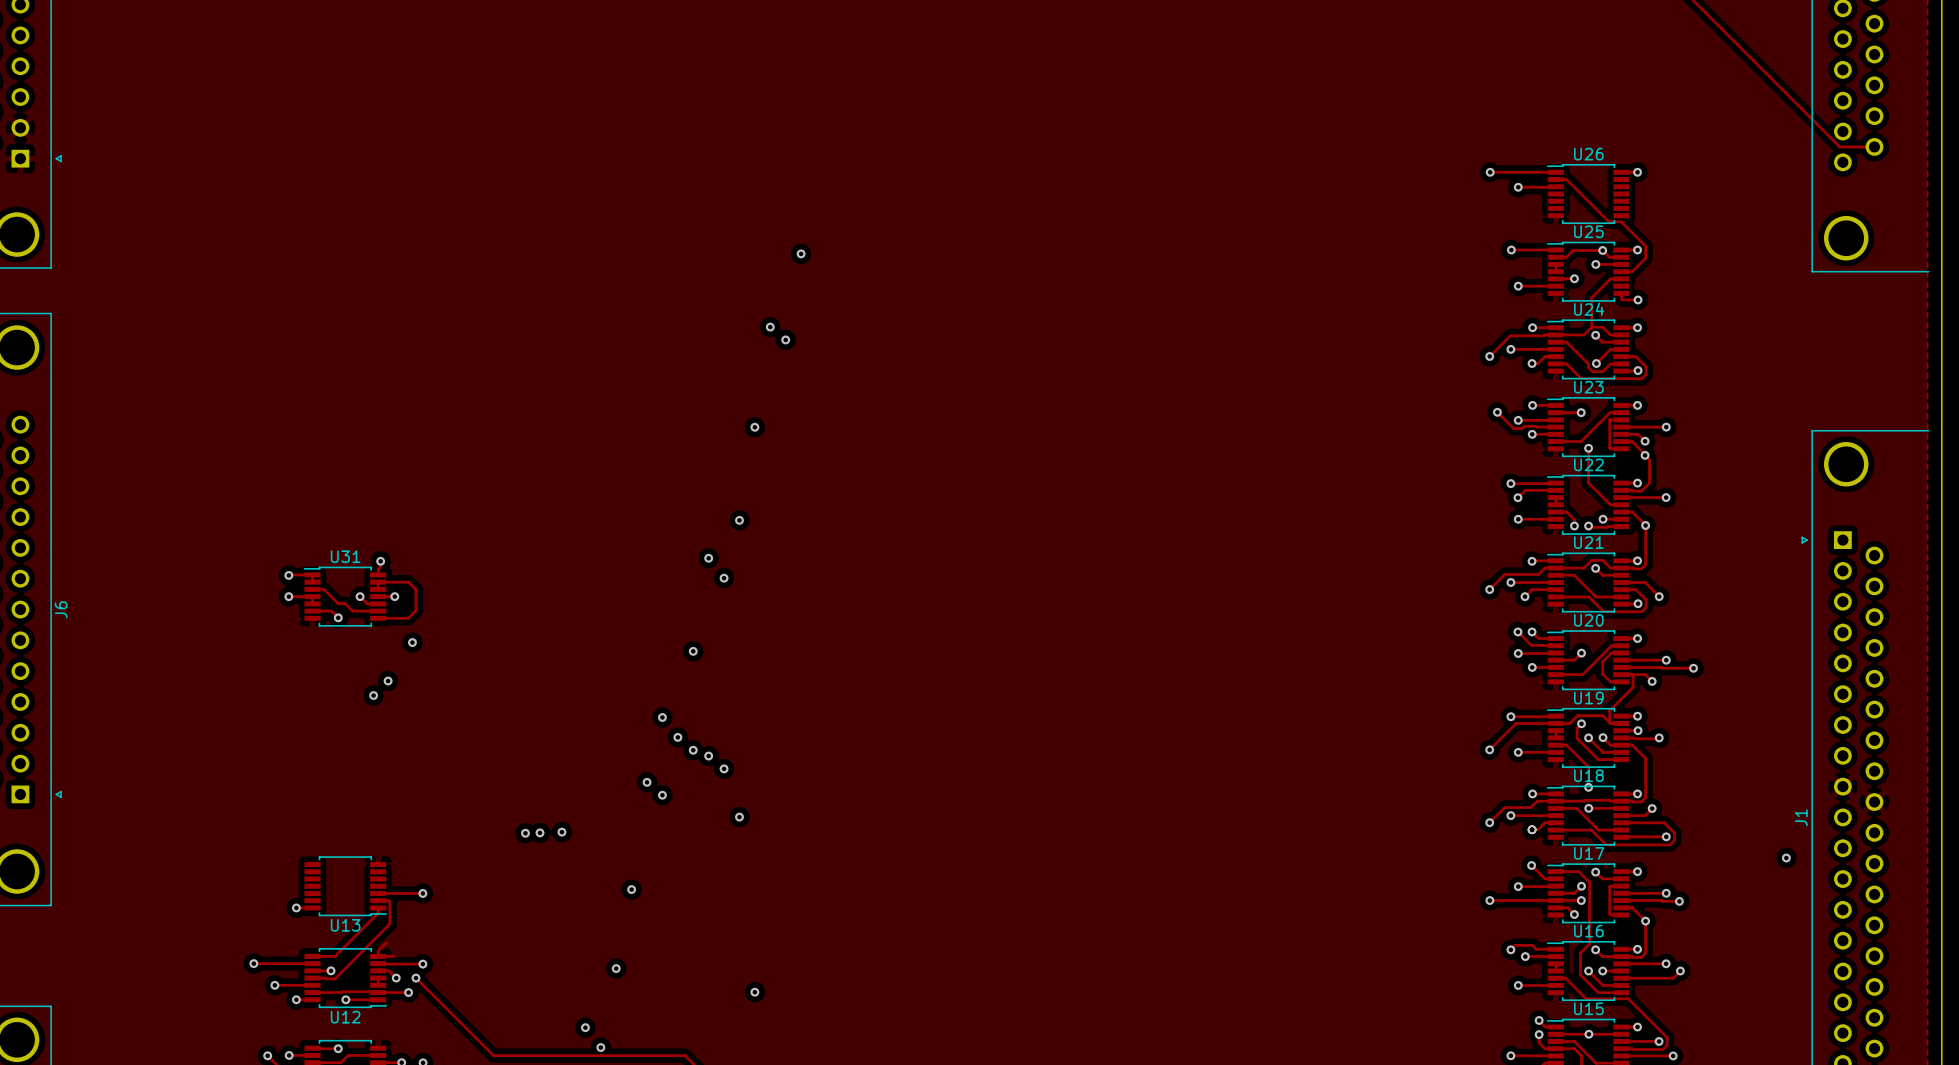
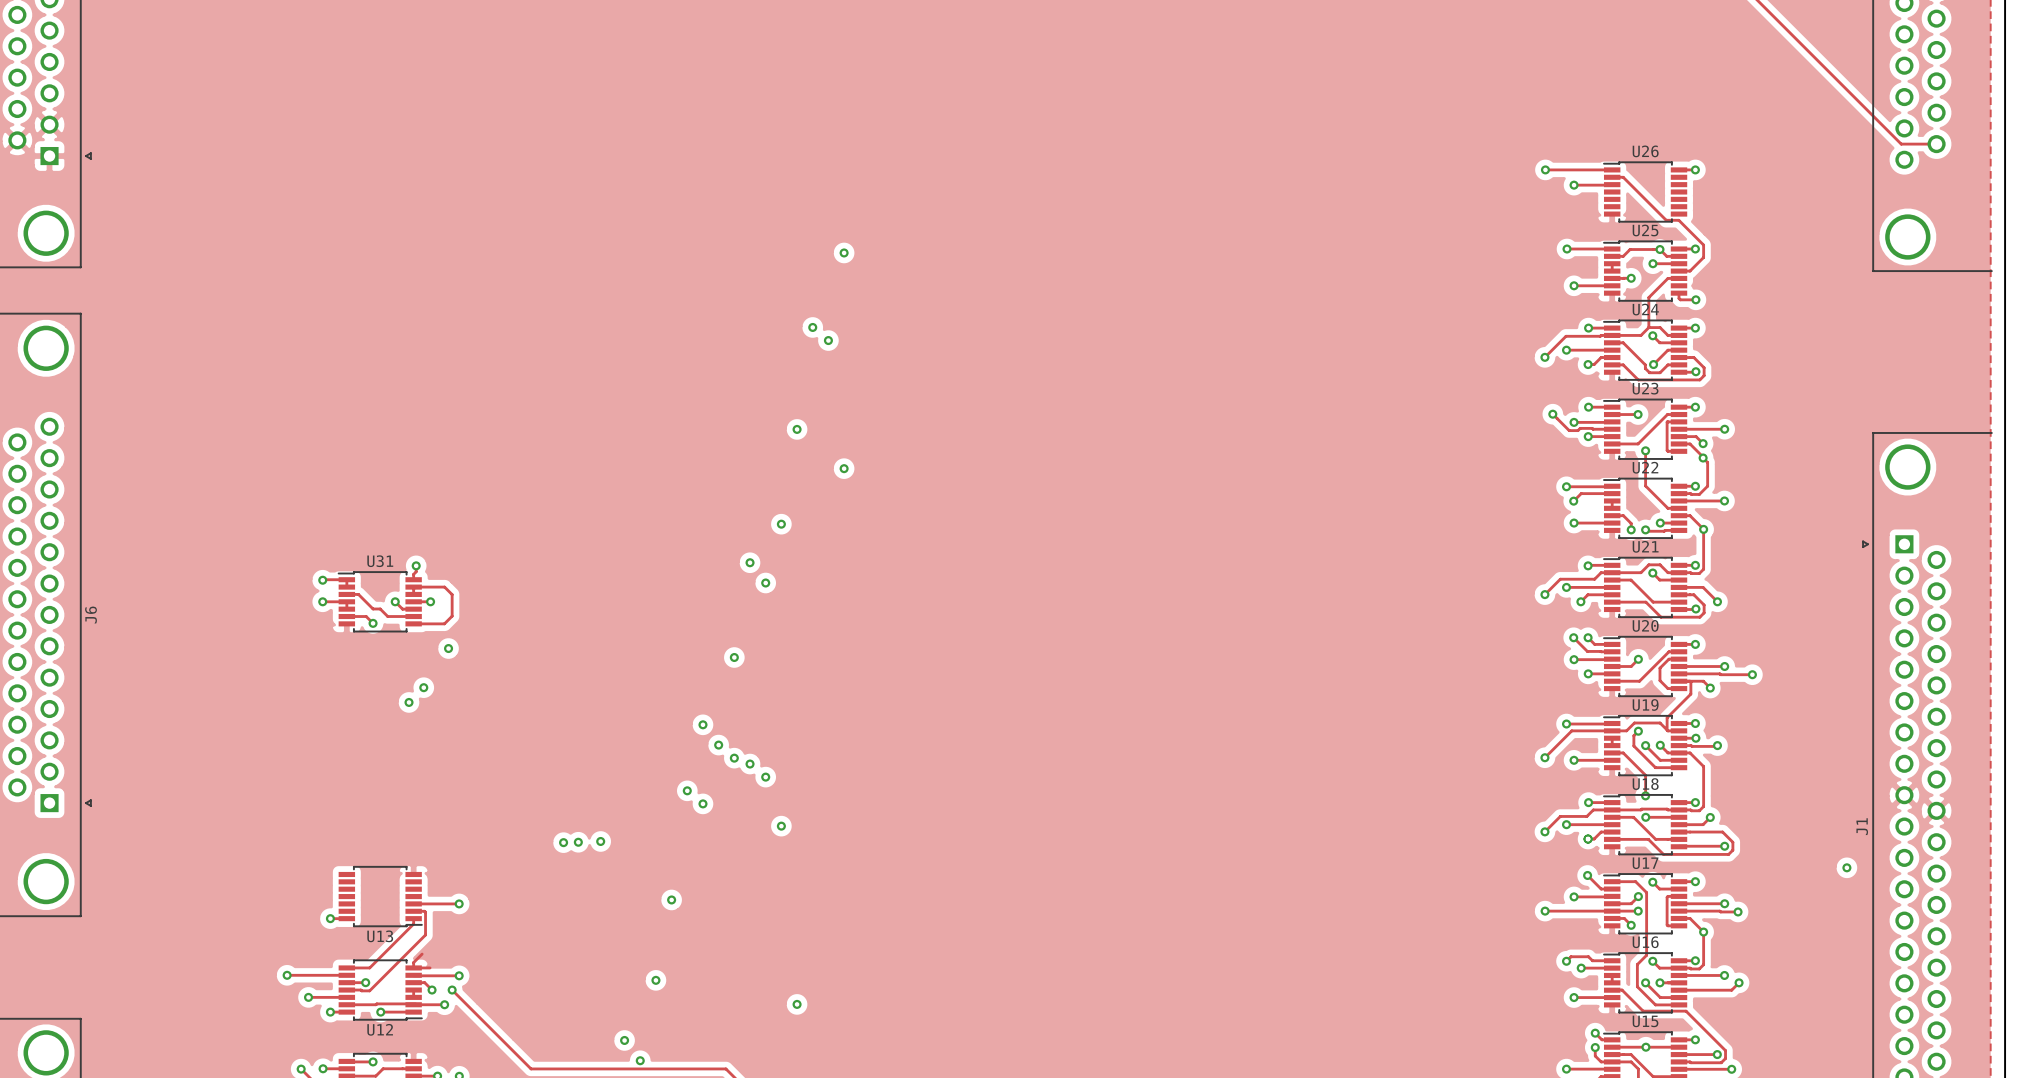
via: none -> (844, 468)

